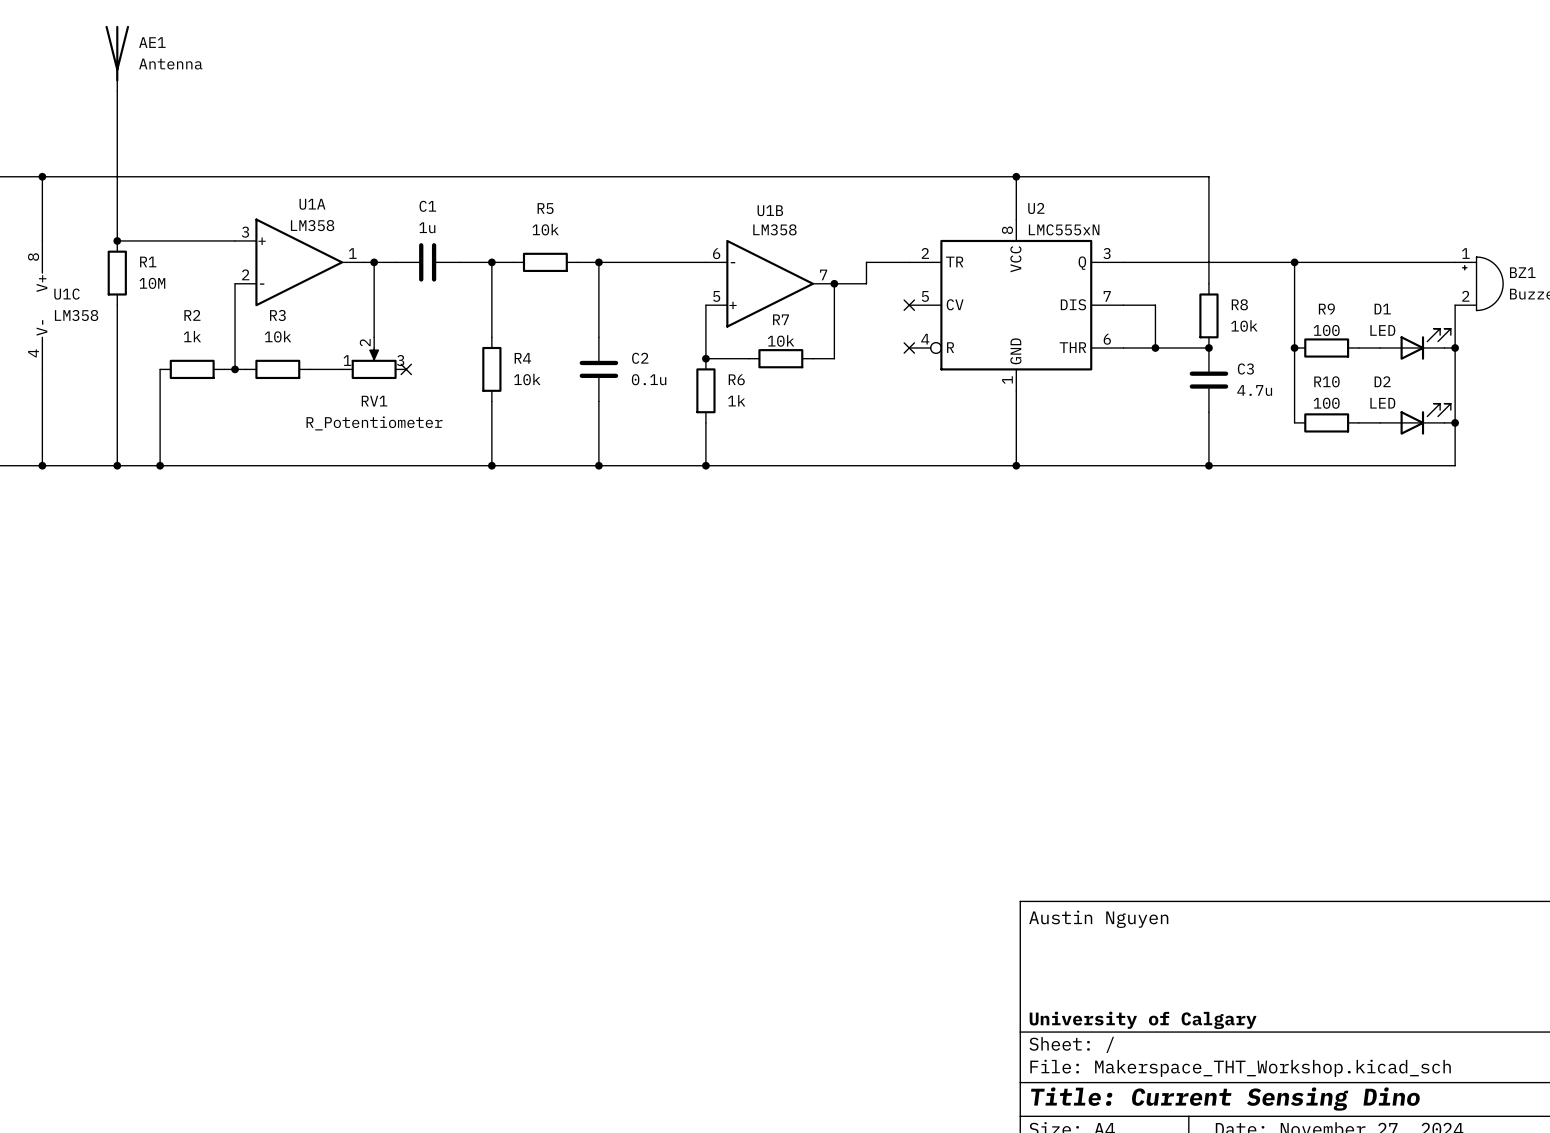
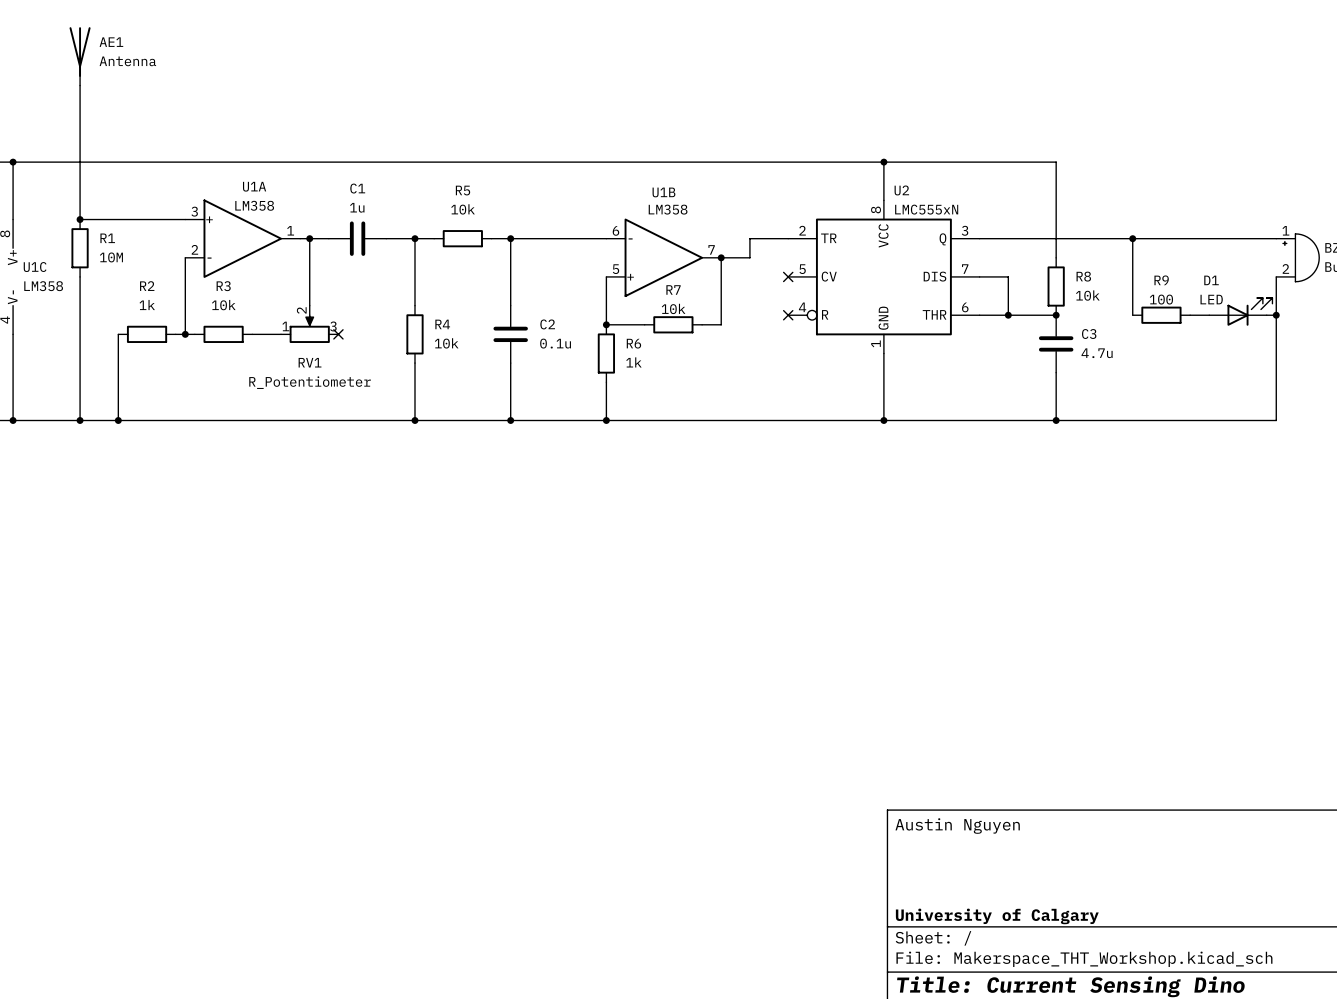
wire: (1294, 348) (1294, 422) -> none
junction: (1294, 348) -> none
D2: LED (1415, 419) -> none
R10: 100 (1326, 422) -> none
wire: (1358, 422) (1380, 422) -> none
wire: (1444, 422) (1455, 422) -> none
junction: (1455, 422) -> none

